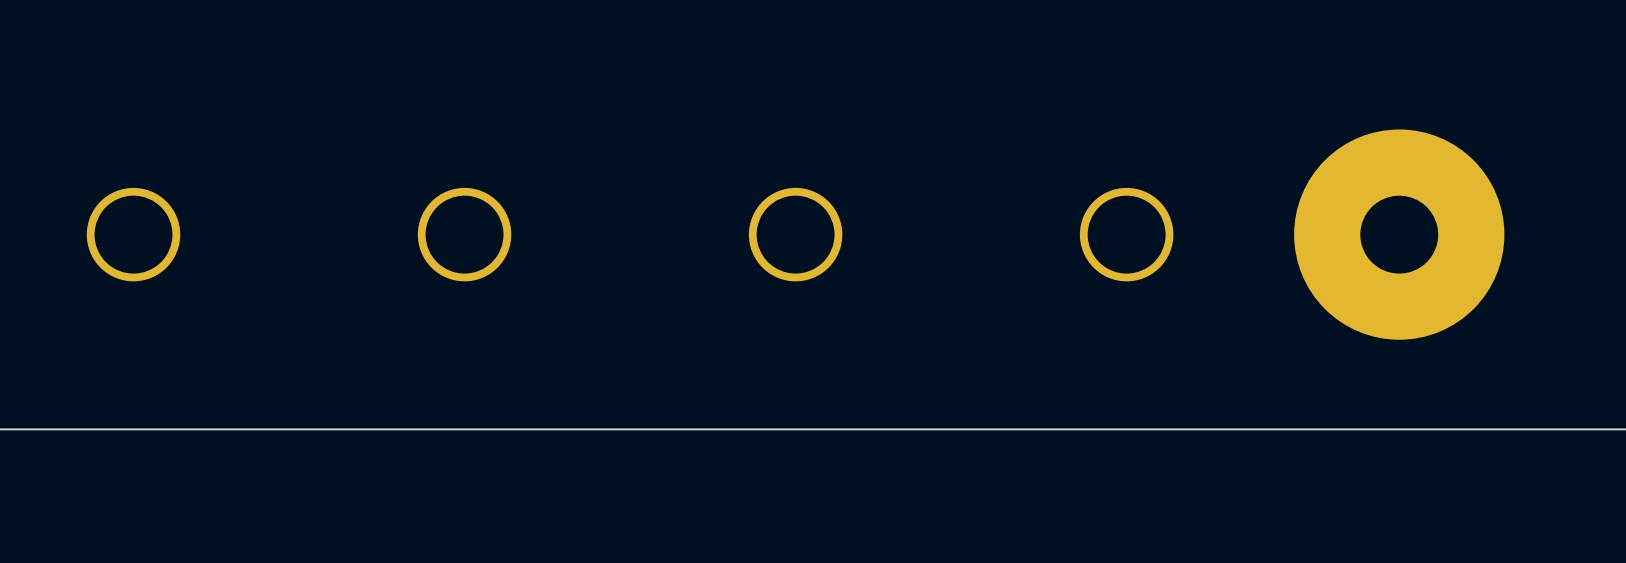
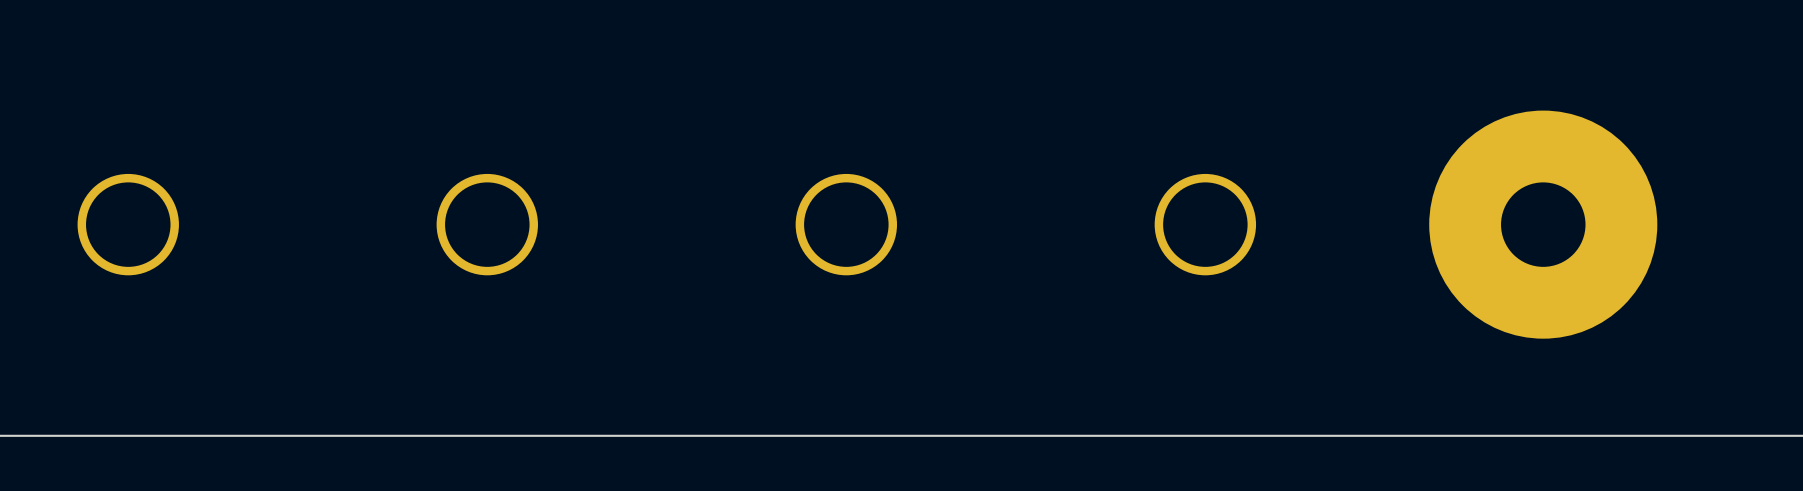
part position: (1399, 234) -> (1543, 224)

